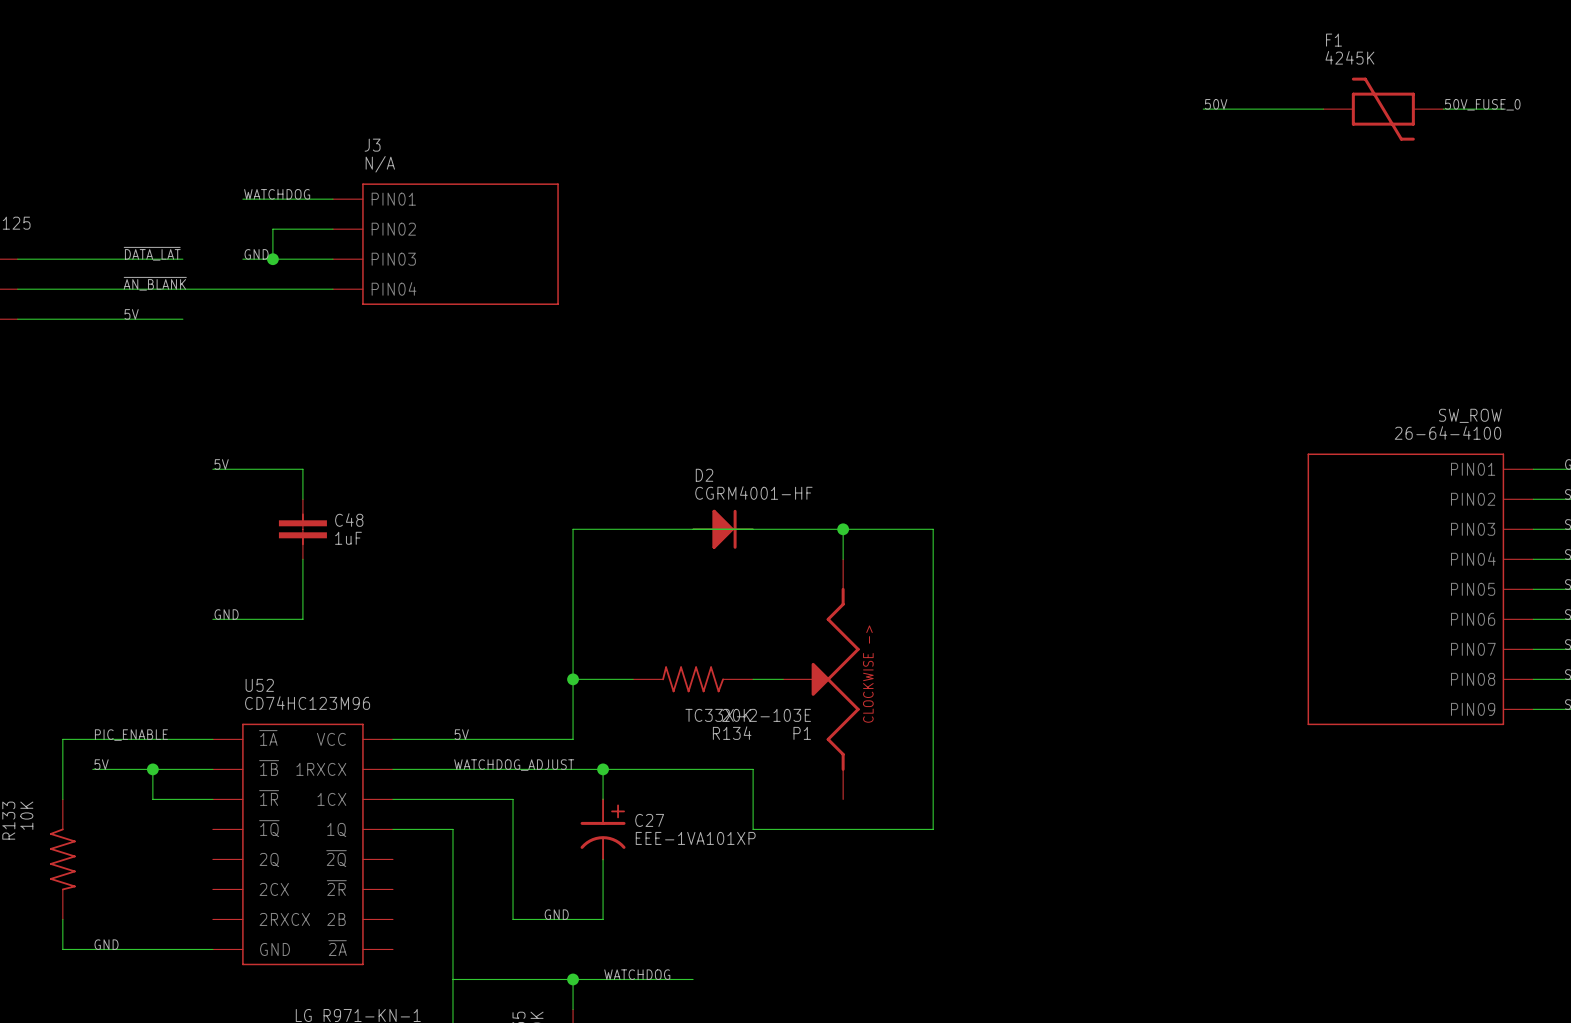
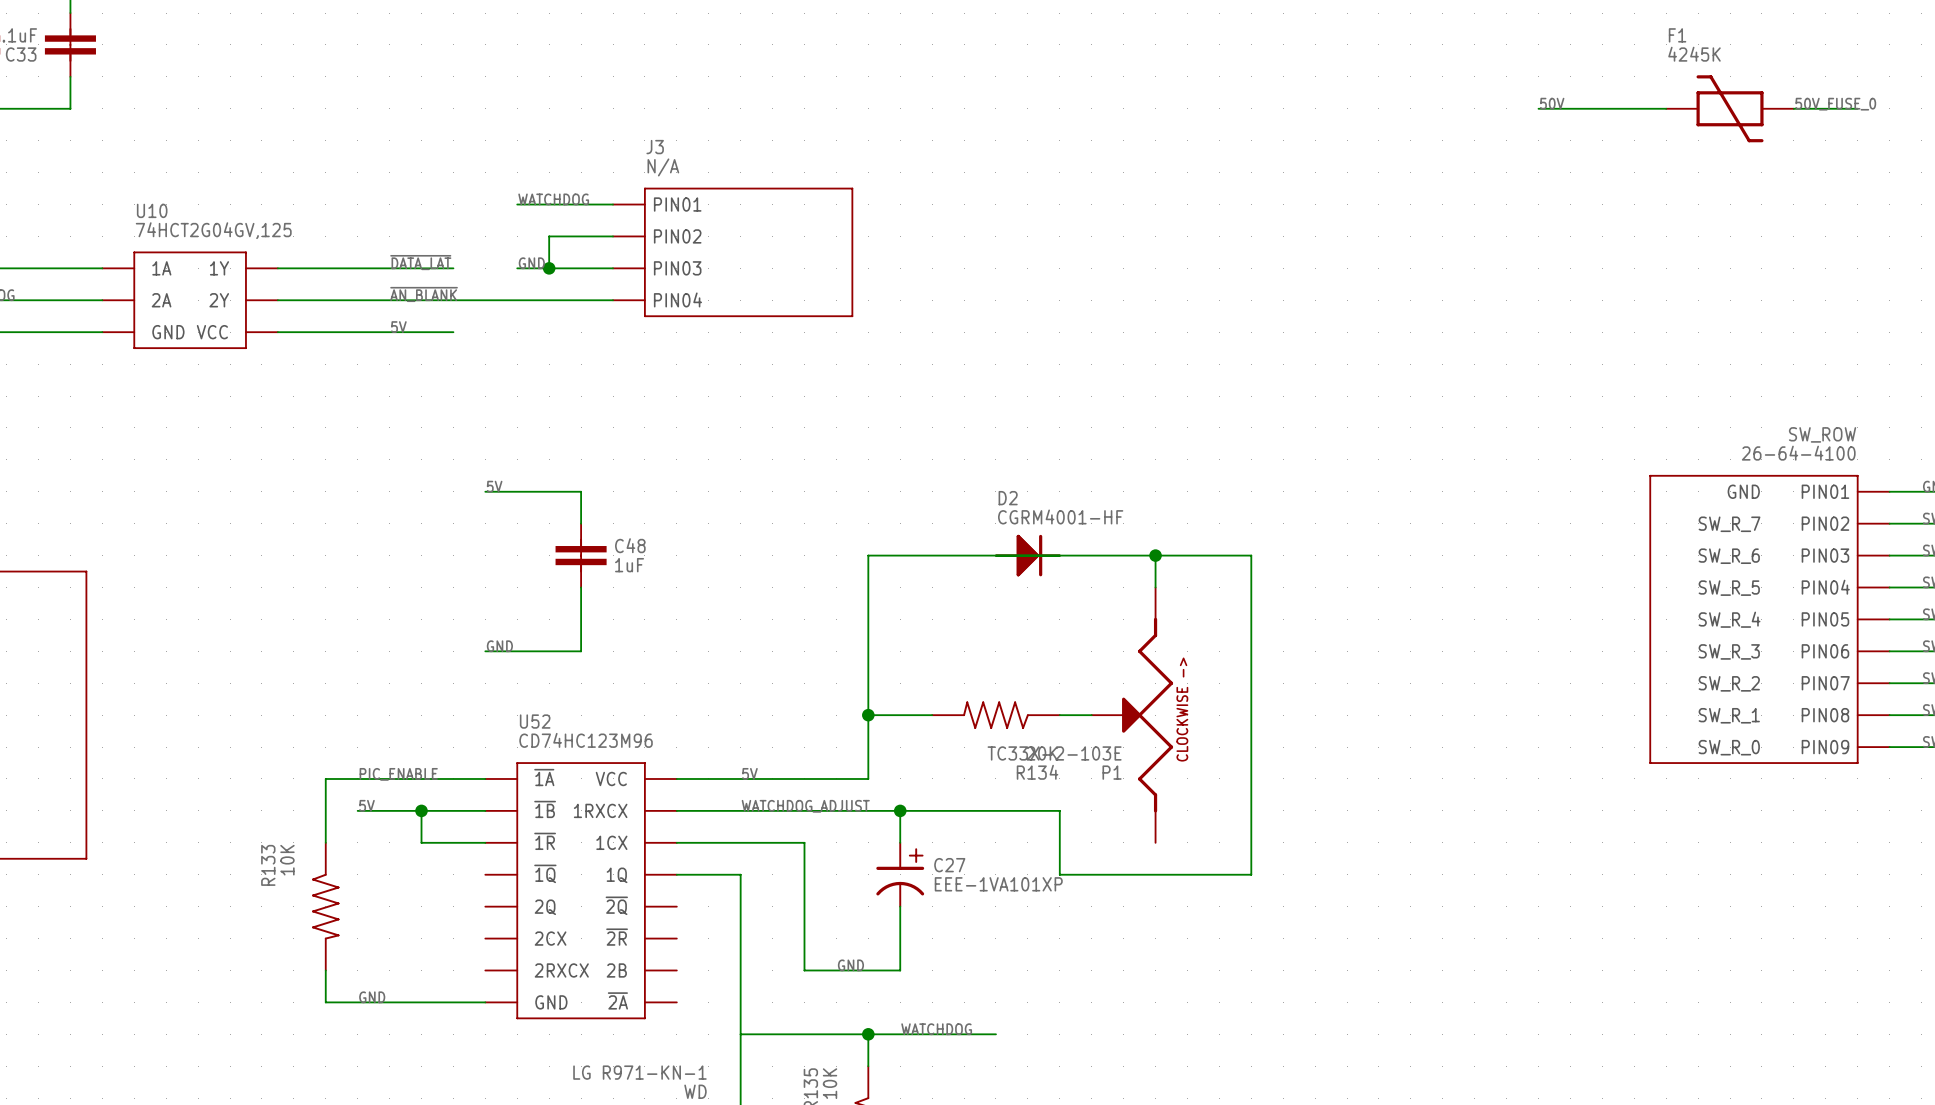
SW_ROW text: none -> GND (1743, 491)
SW_ROW text: none -> SW_R_7 (1729, 524)
SW_ROW text: none -> SW_R_6 (1729, 556)
SW_ROW text: none -> SW_R_5 (1729, 588)
SW_ROW text: none -> SW_R_4 (1729, 619)
SW_ROW text: none -> SW_R_3 (1729, 651)
SW_ROW text: none -> SW_R_2 (1729, 683)
SW_ROW text: none -> SW_R_1 (1729, 715)
SW_ROW text: none -> SW_R_0 (1729, 747)

